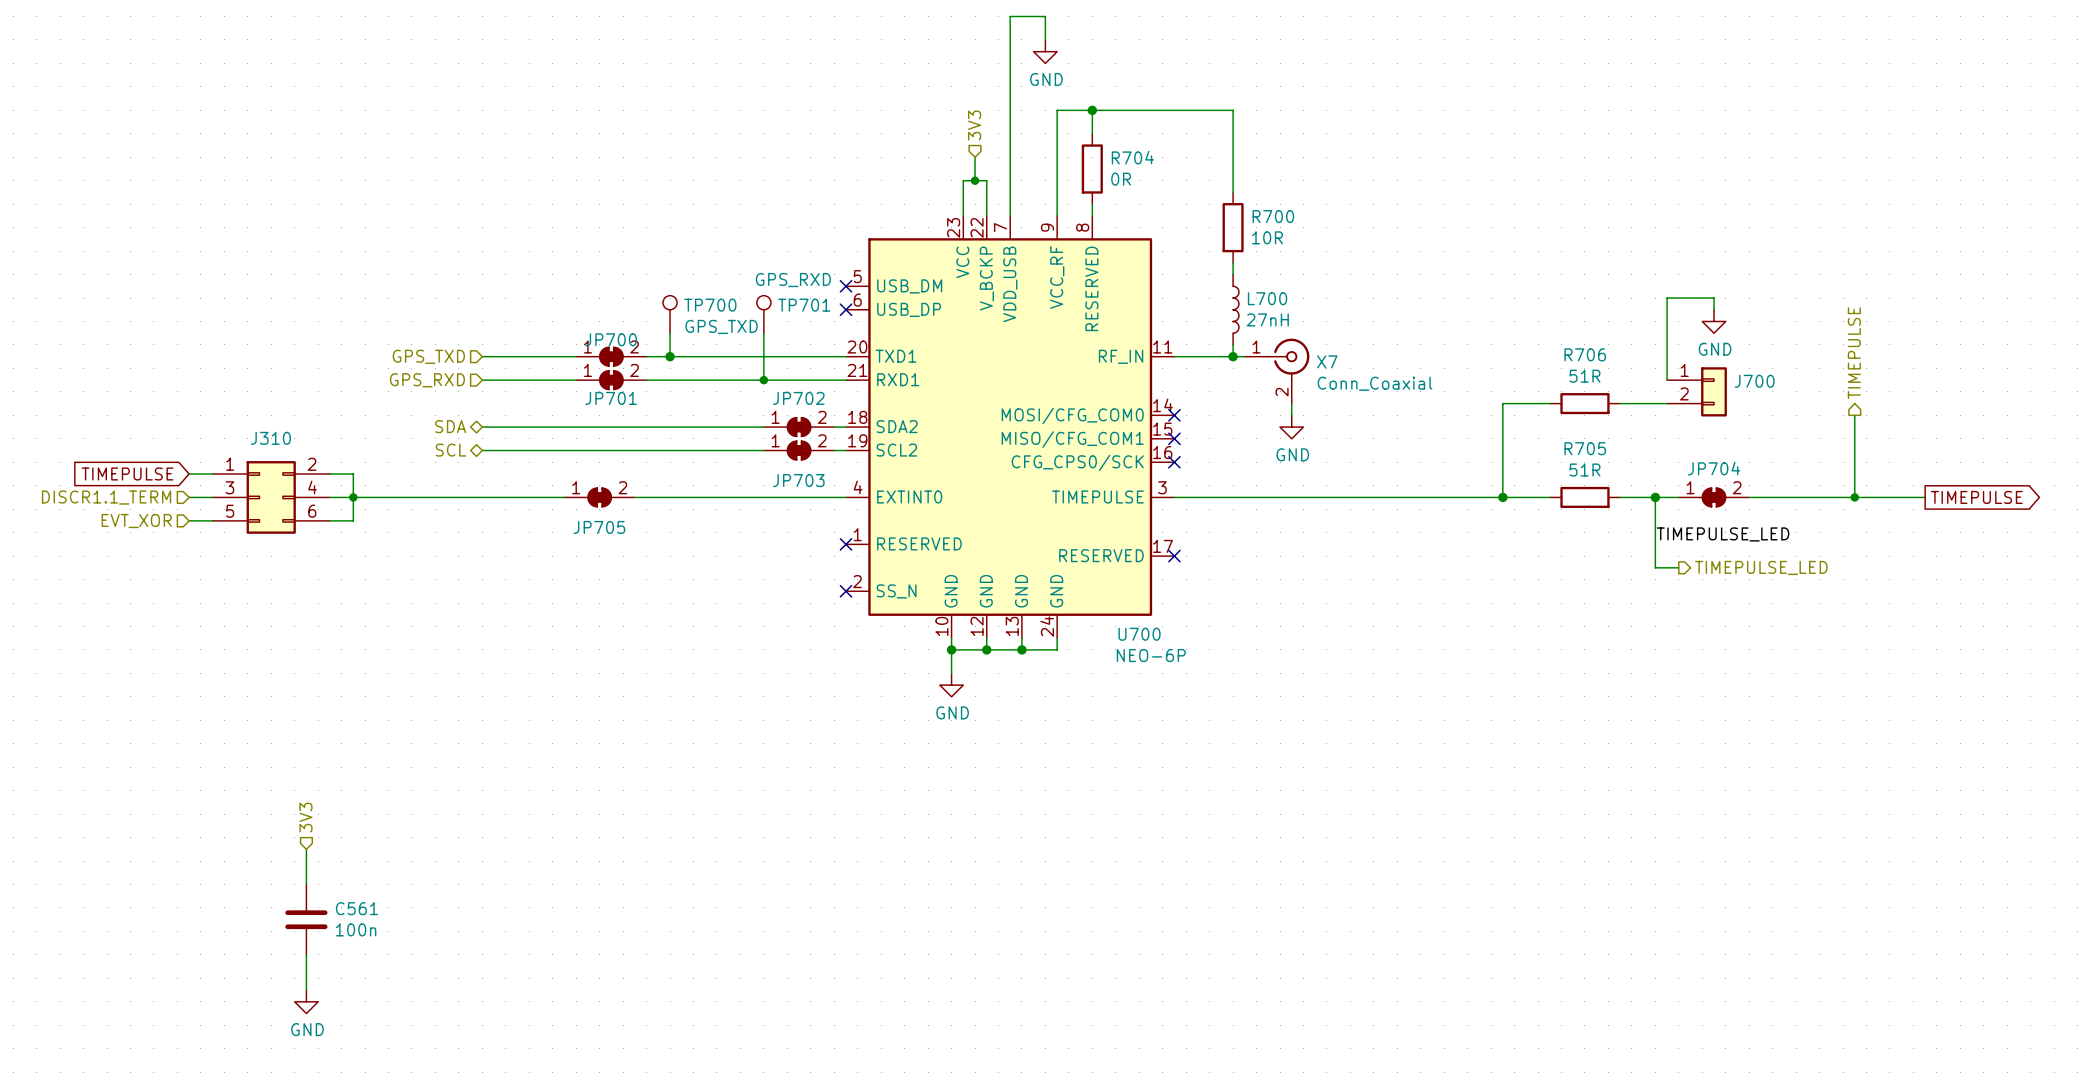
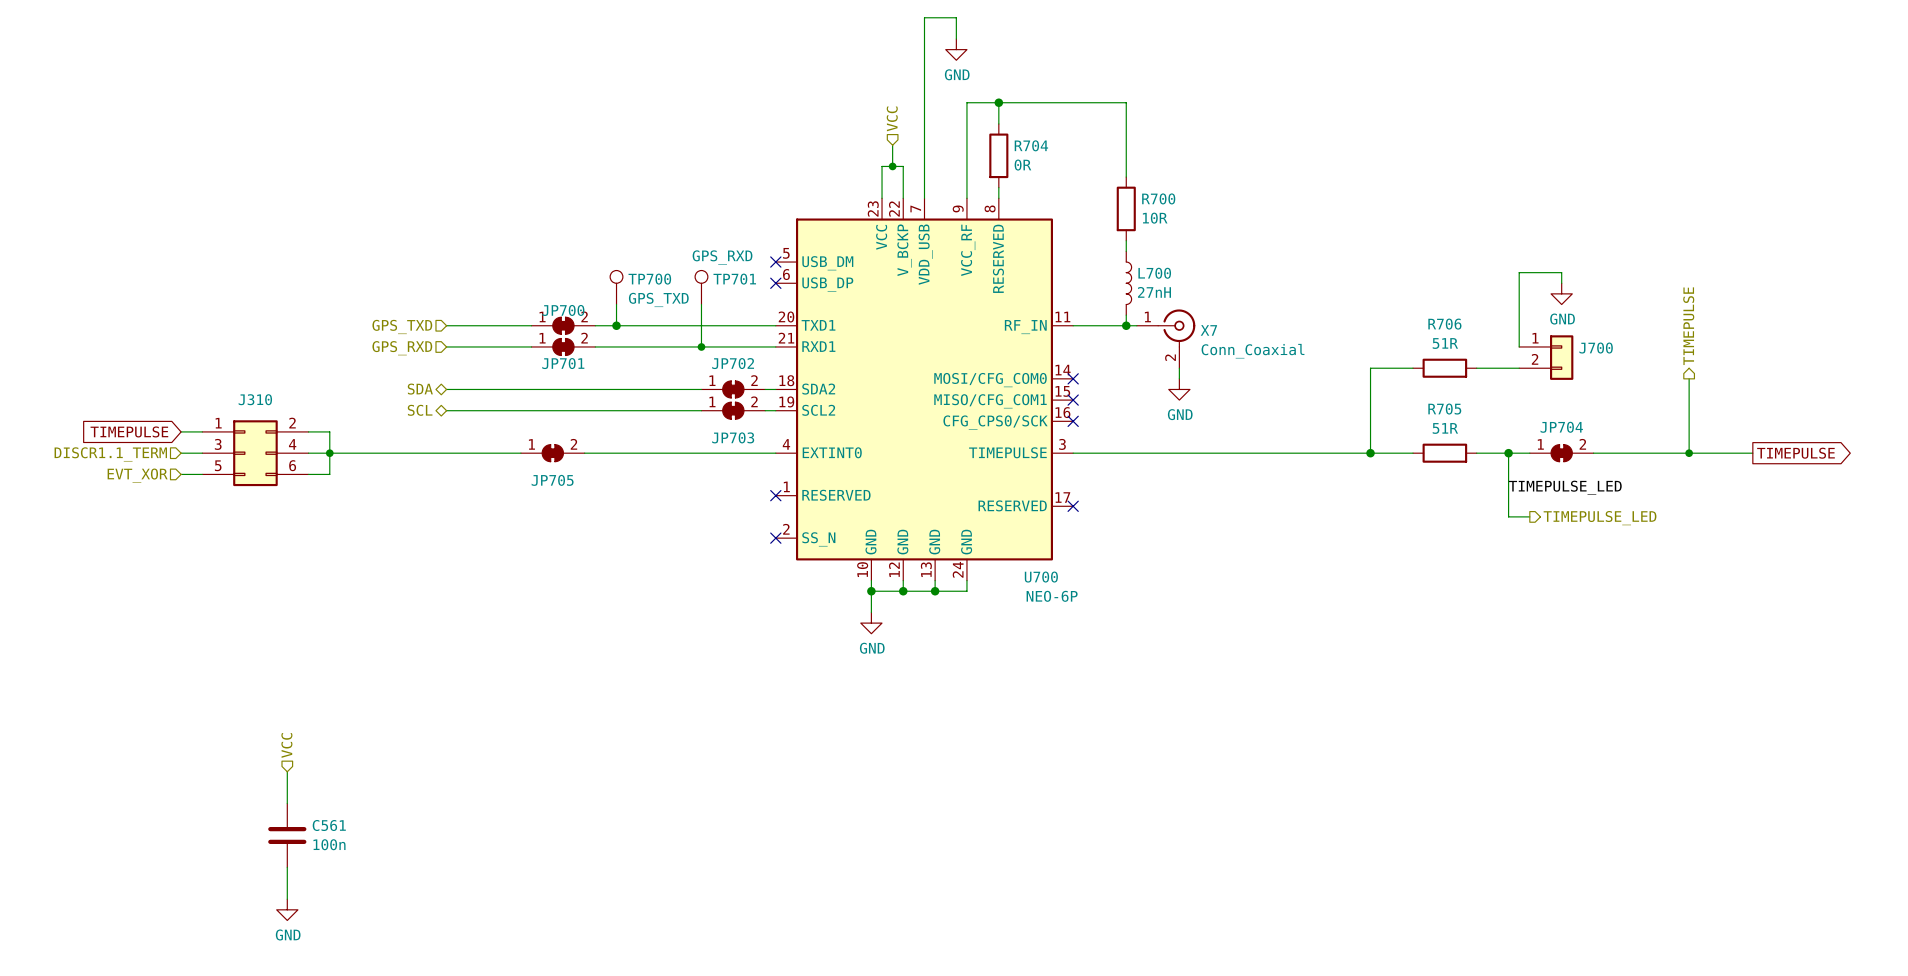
hierarchical label: 3V3 (974, 125) -> VCC (892, 118)
hierarchical label: 3V3 (305, 817) -> VCC (286, 745)

